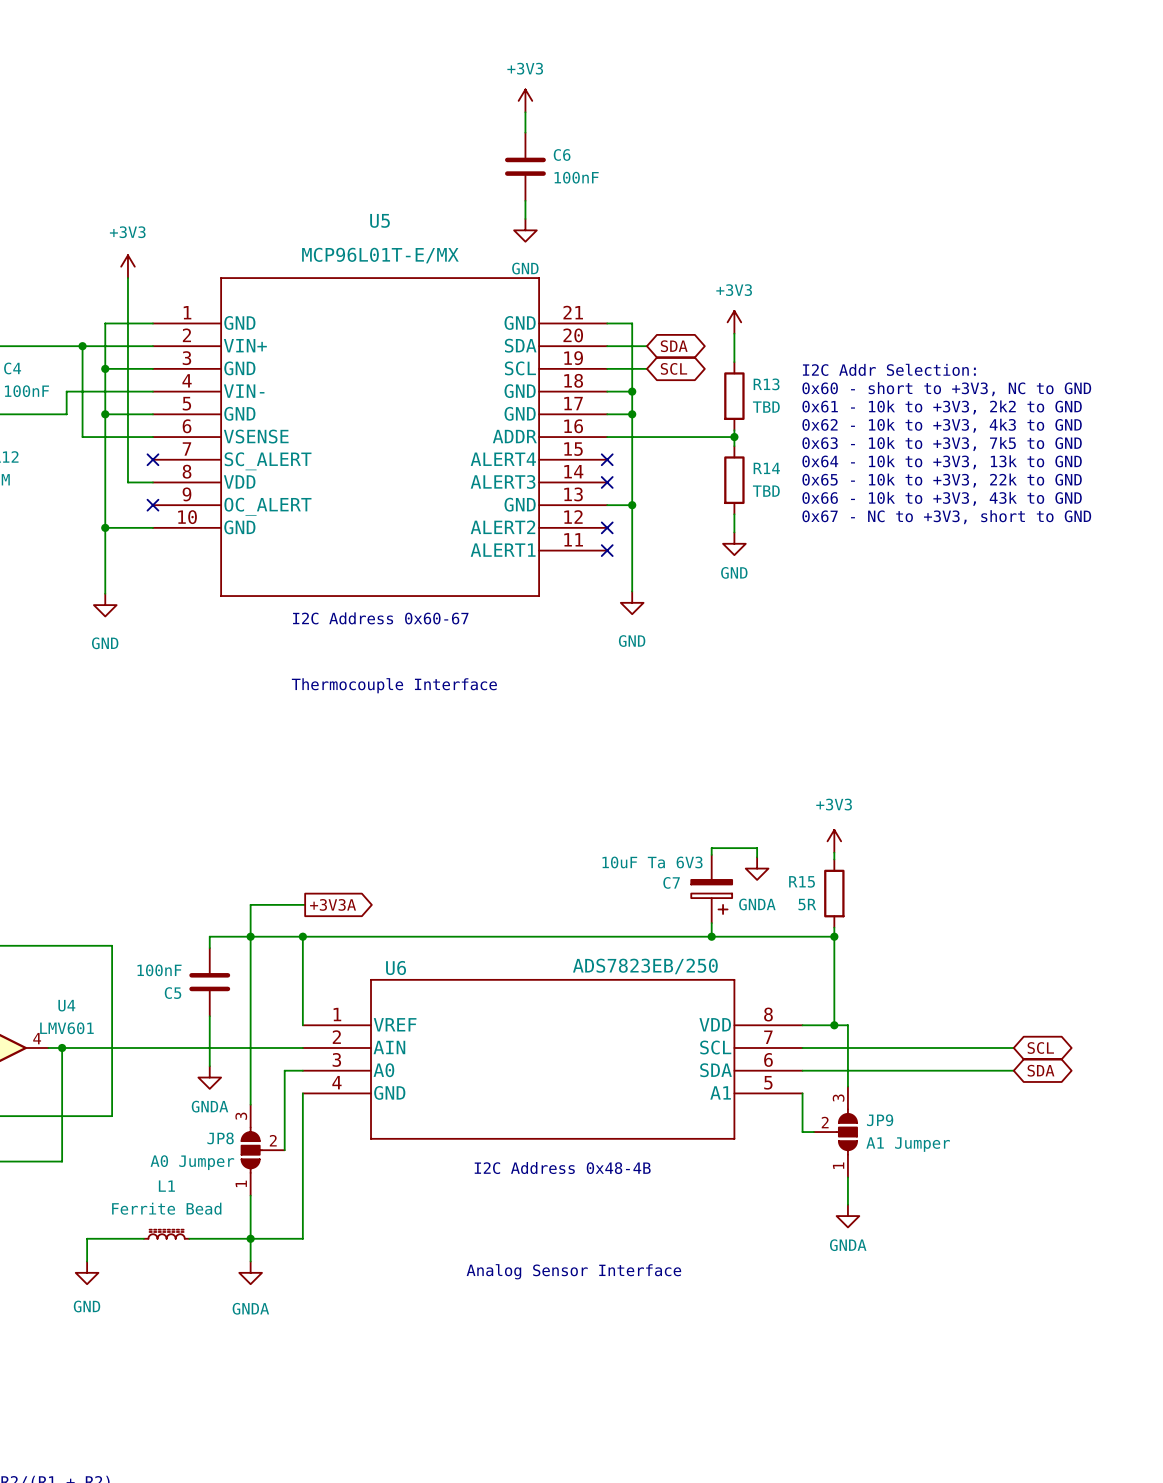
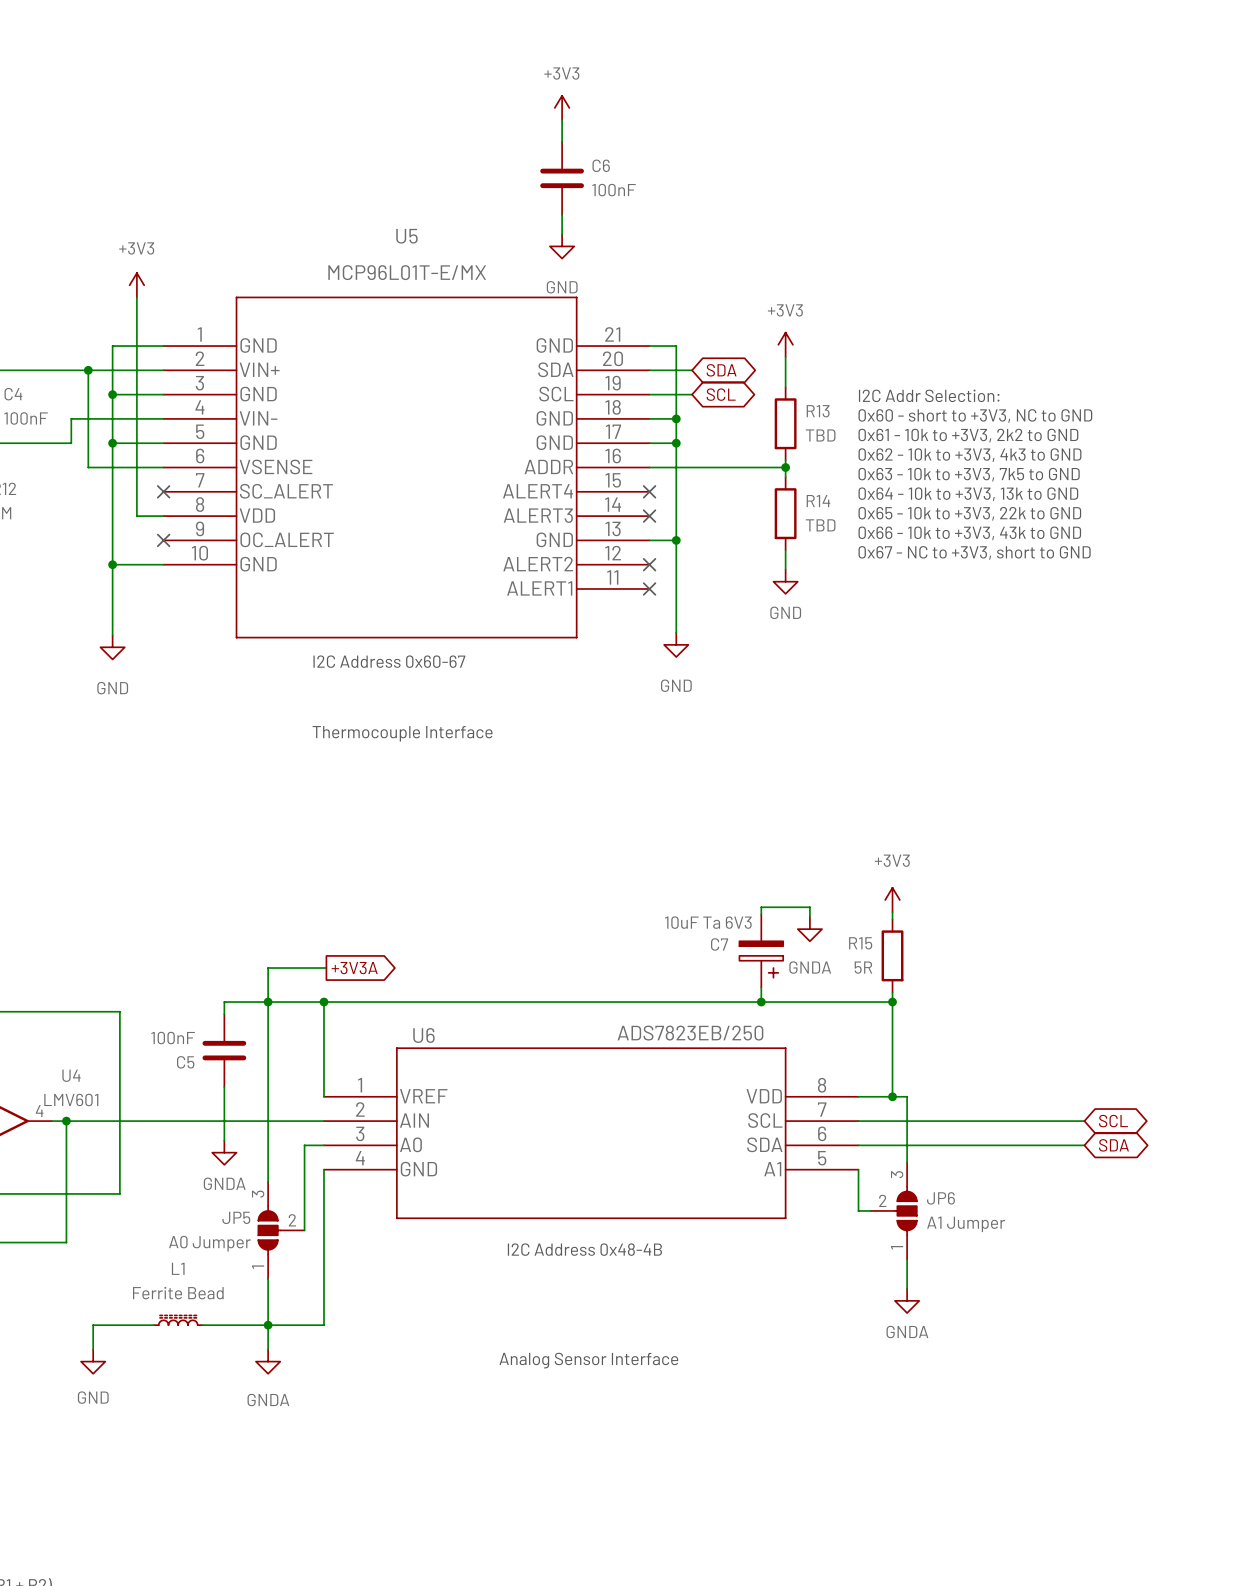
JP9 name: JP9 (880, 1120) -> JP6 (940, 1198)
JP8 name: JP8 (220, 1138) -> JP5 (236, 1217)

